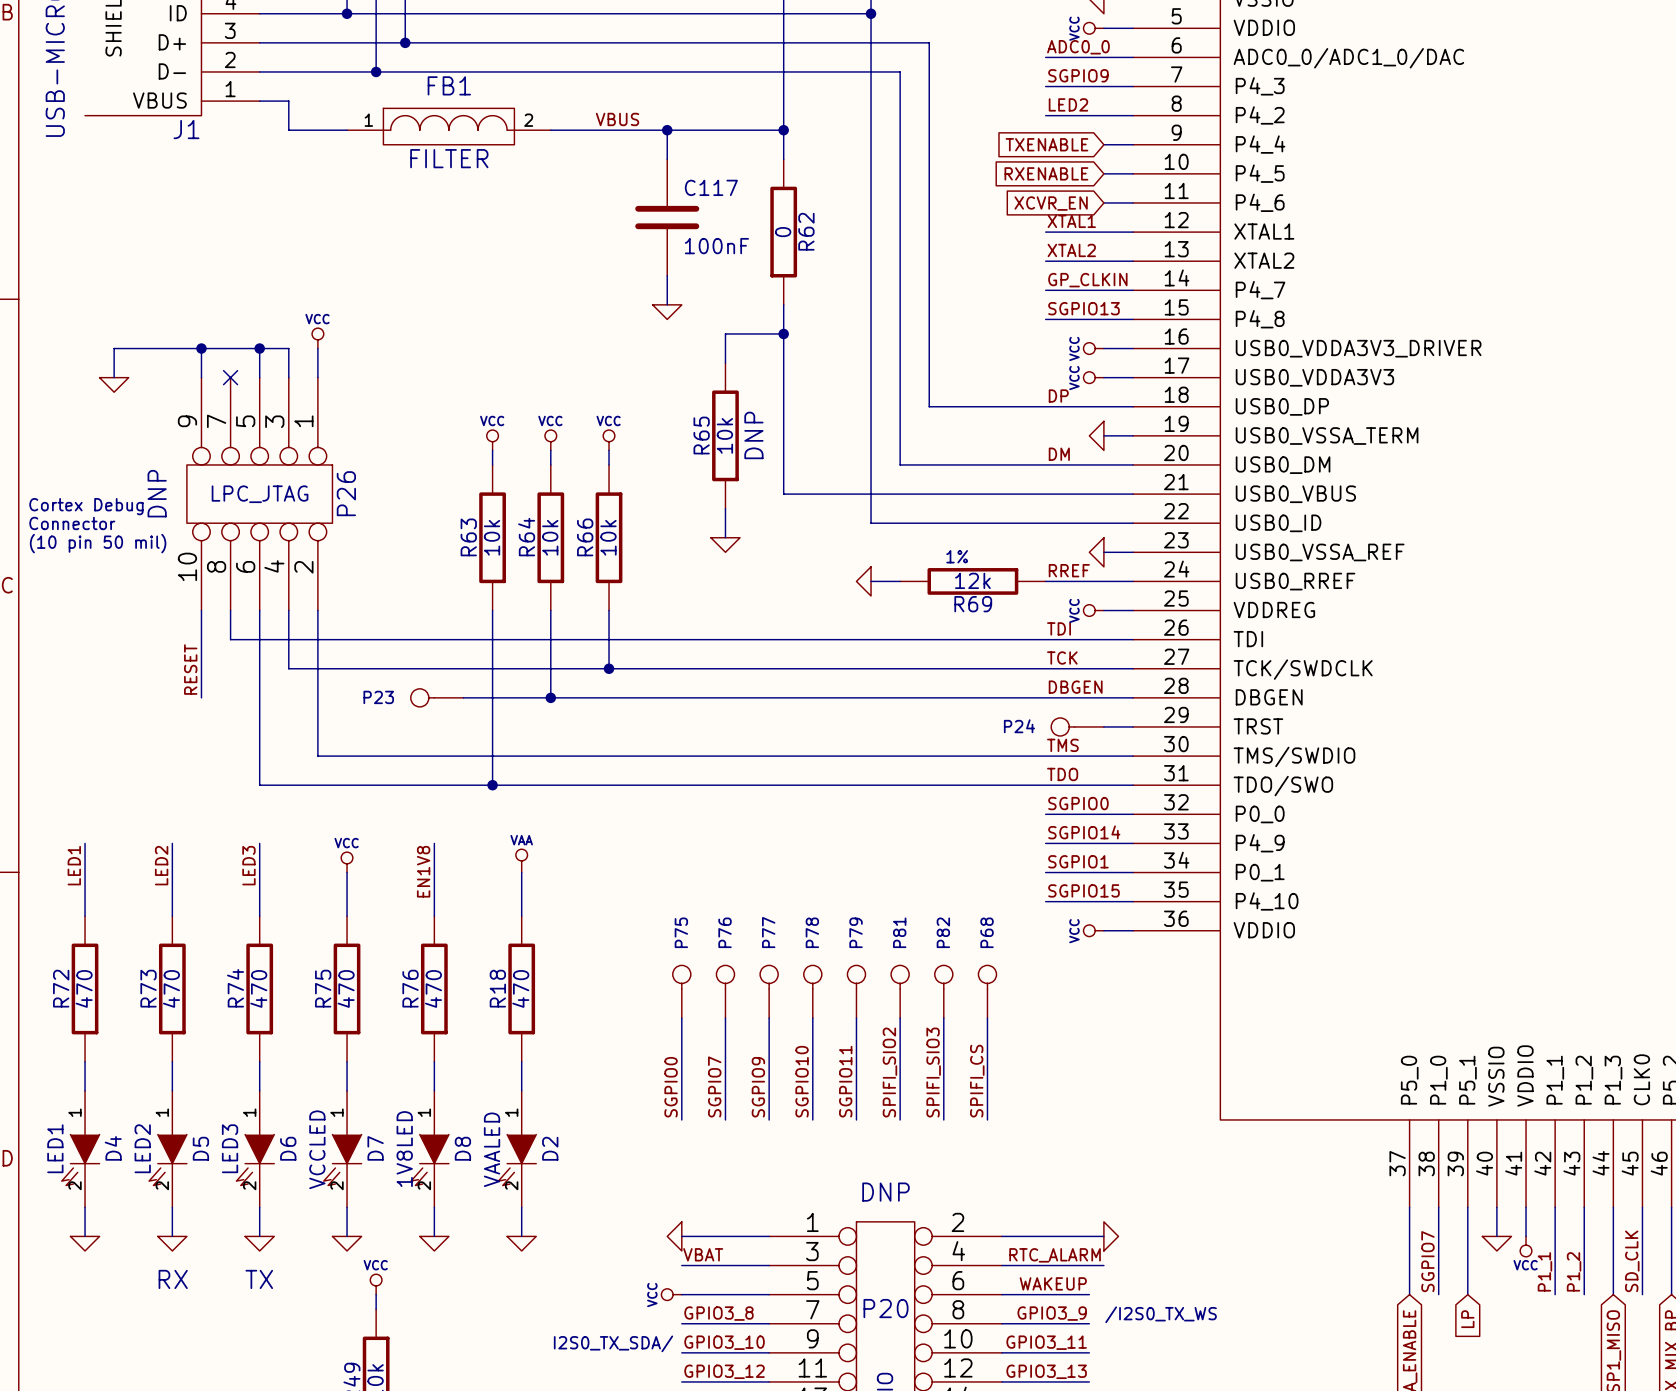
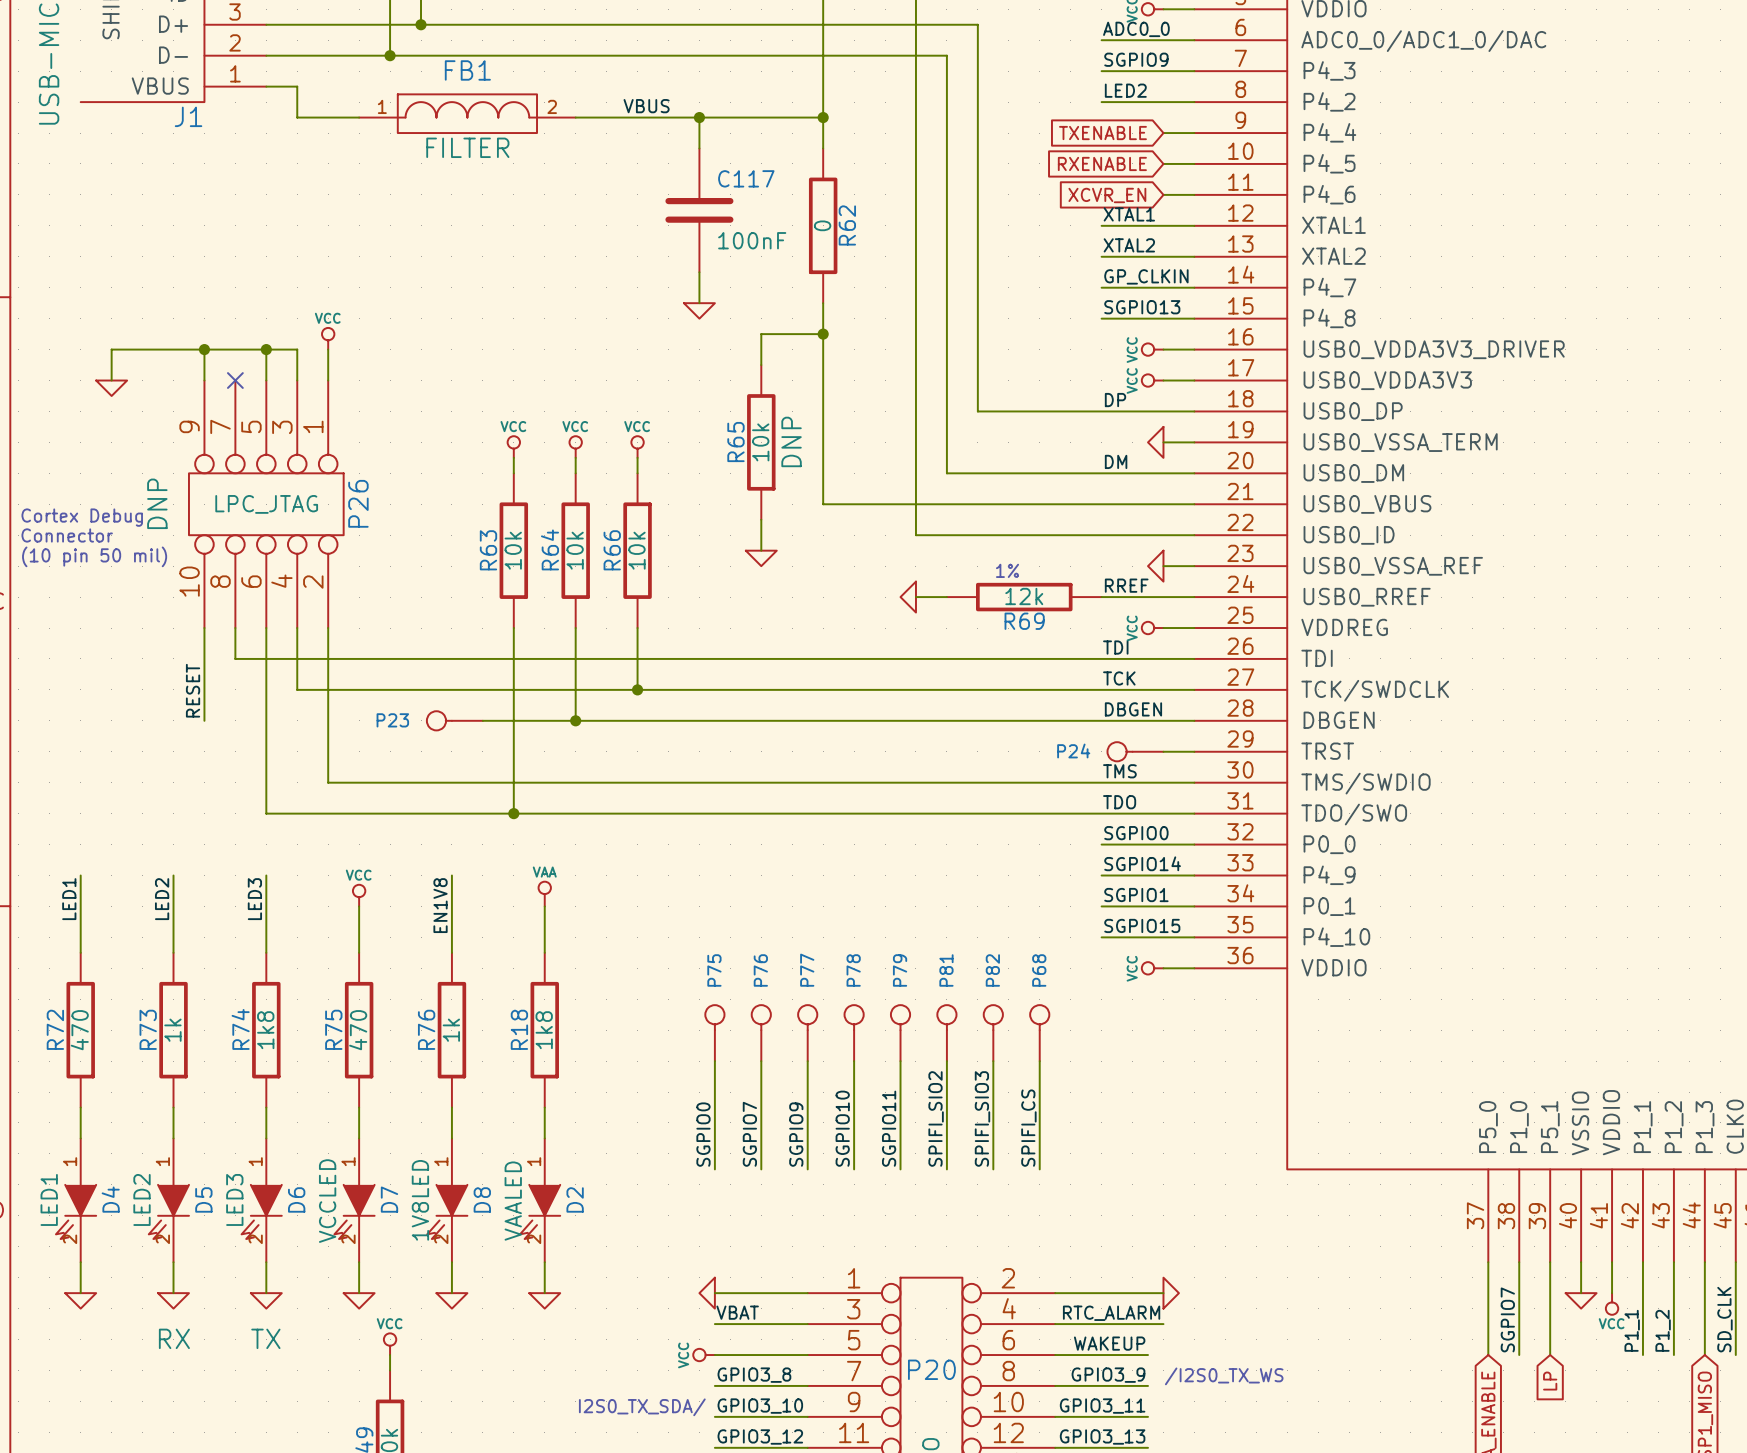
R73 value: 470 (171, 988) -> 1k (172, 1030)
R74 value: 470 (258, 988) -> 1k8 (265, 1030)
R76 value: 470 (433, 988) -> 1k (451, 1030)
R18 value: 470 (520, 988) -> 1k8 (544, 1030)
P20 text: DNP (885, 1192) -> none

